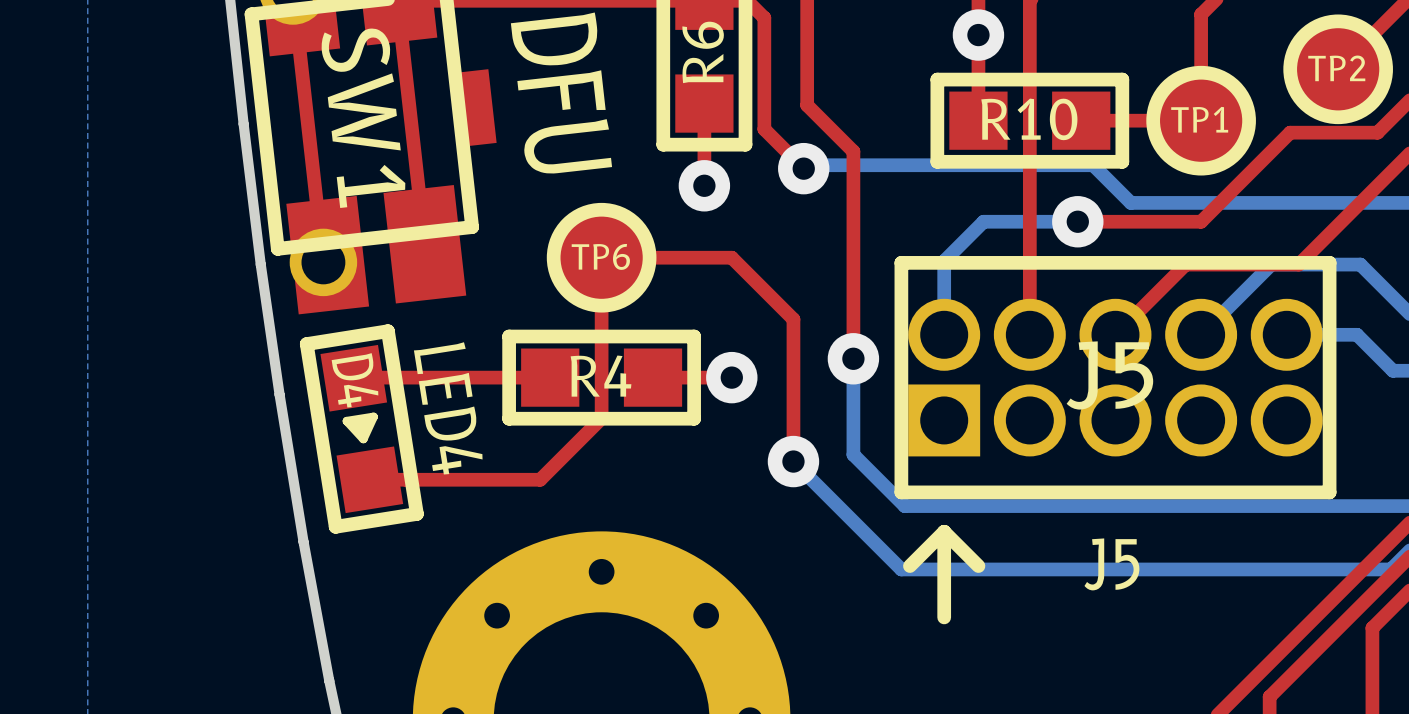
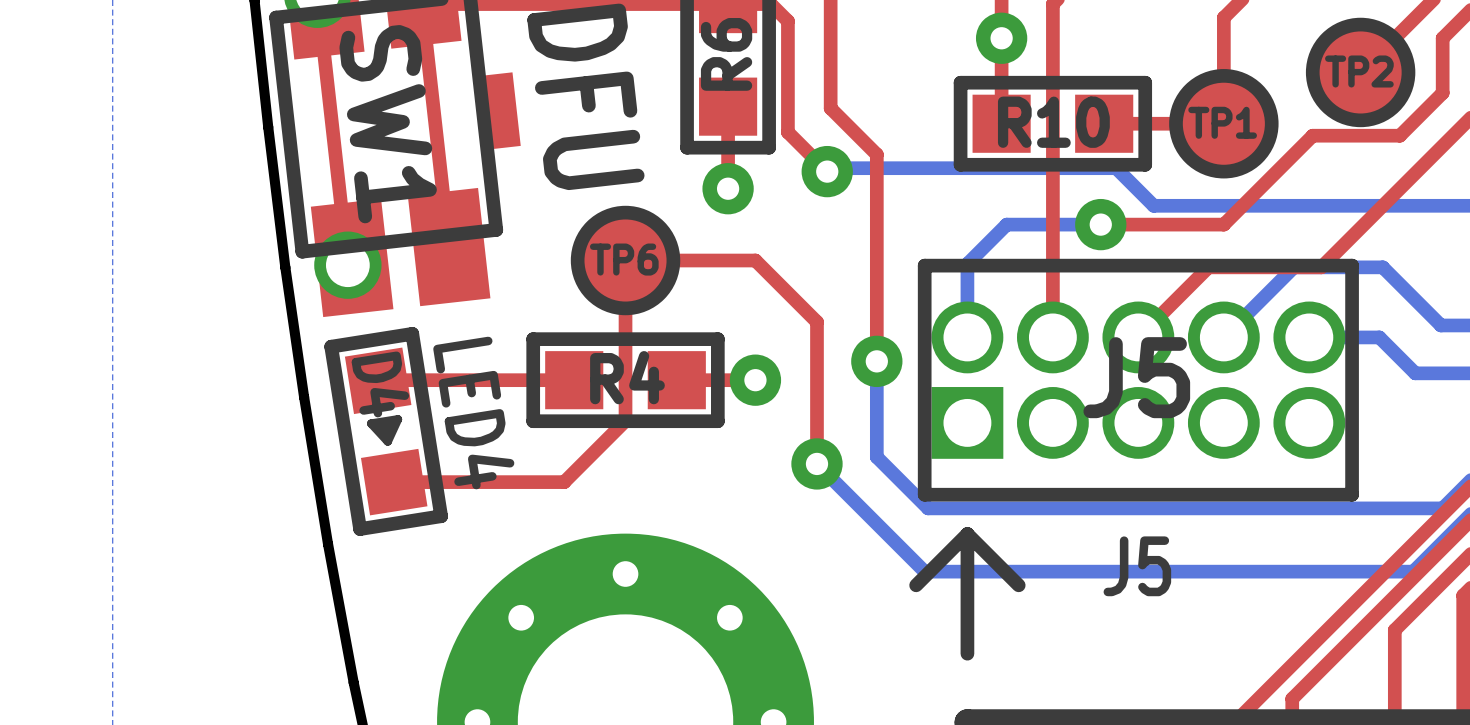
line: none -> (933, 568) (916, 585)
line: none -> (1001, 568) (1018, 585)
line: none -> (967, 619) (967, 653)

